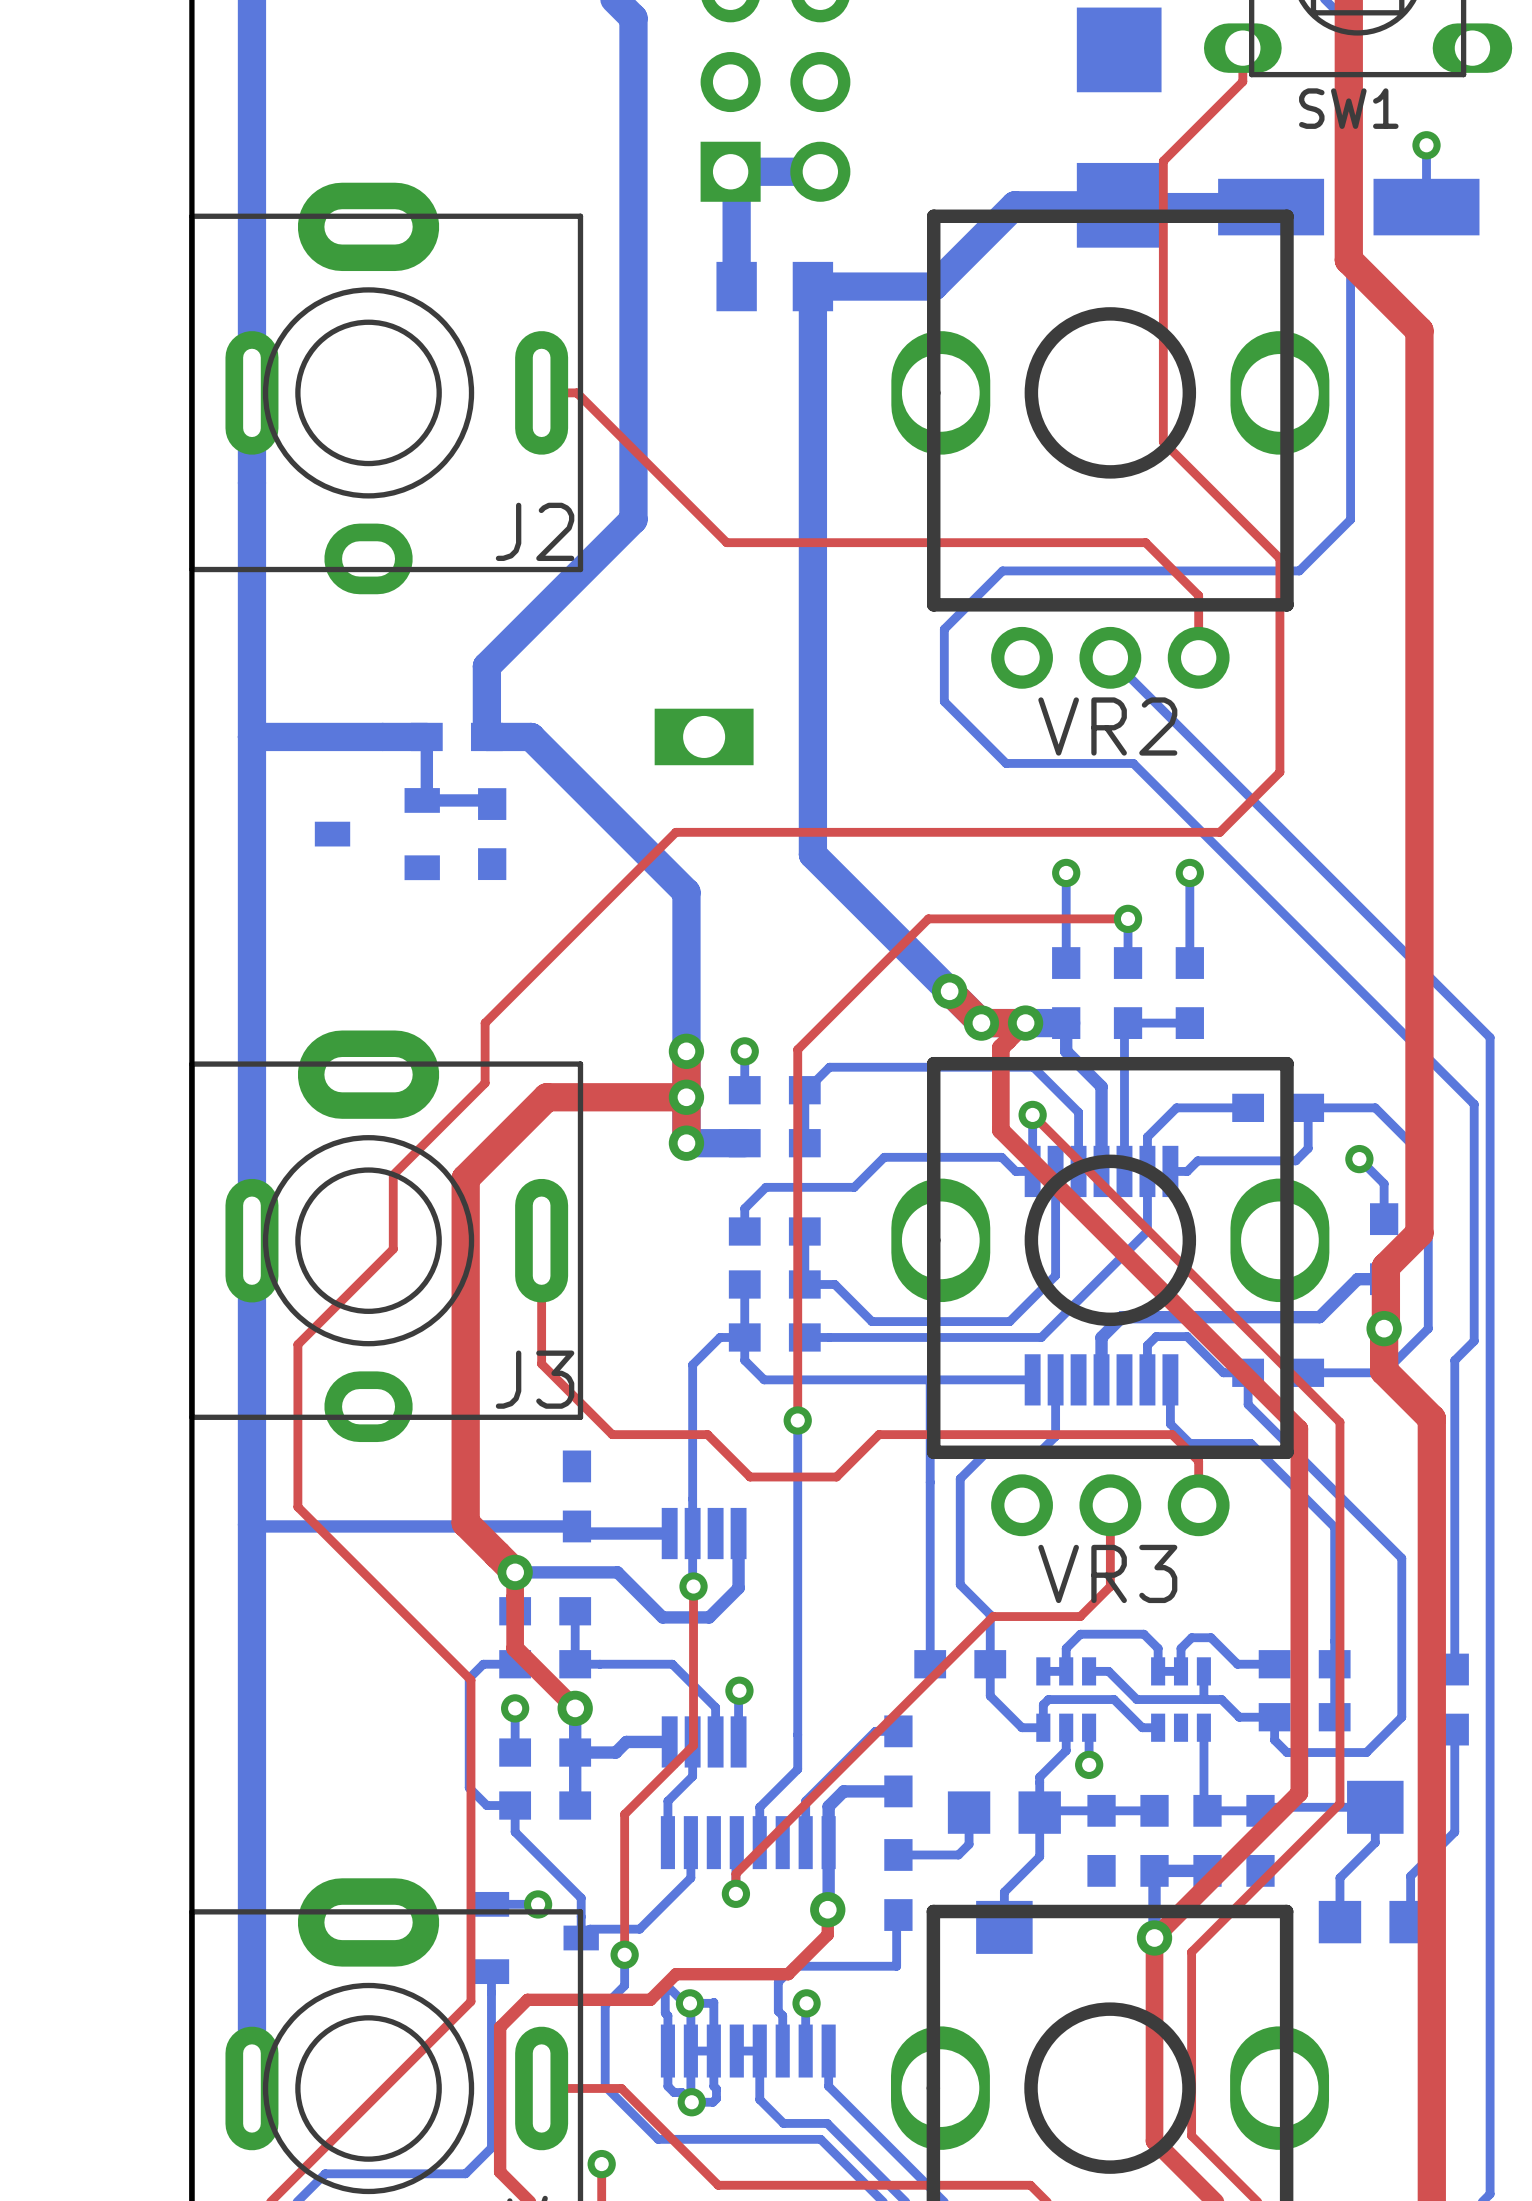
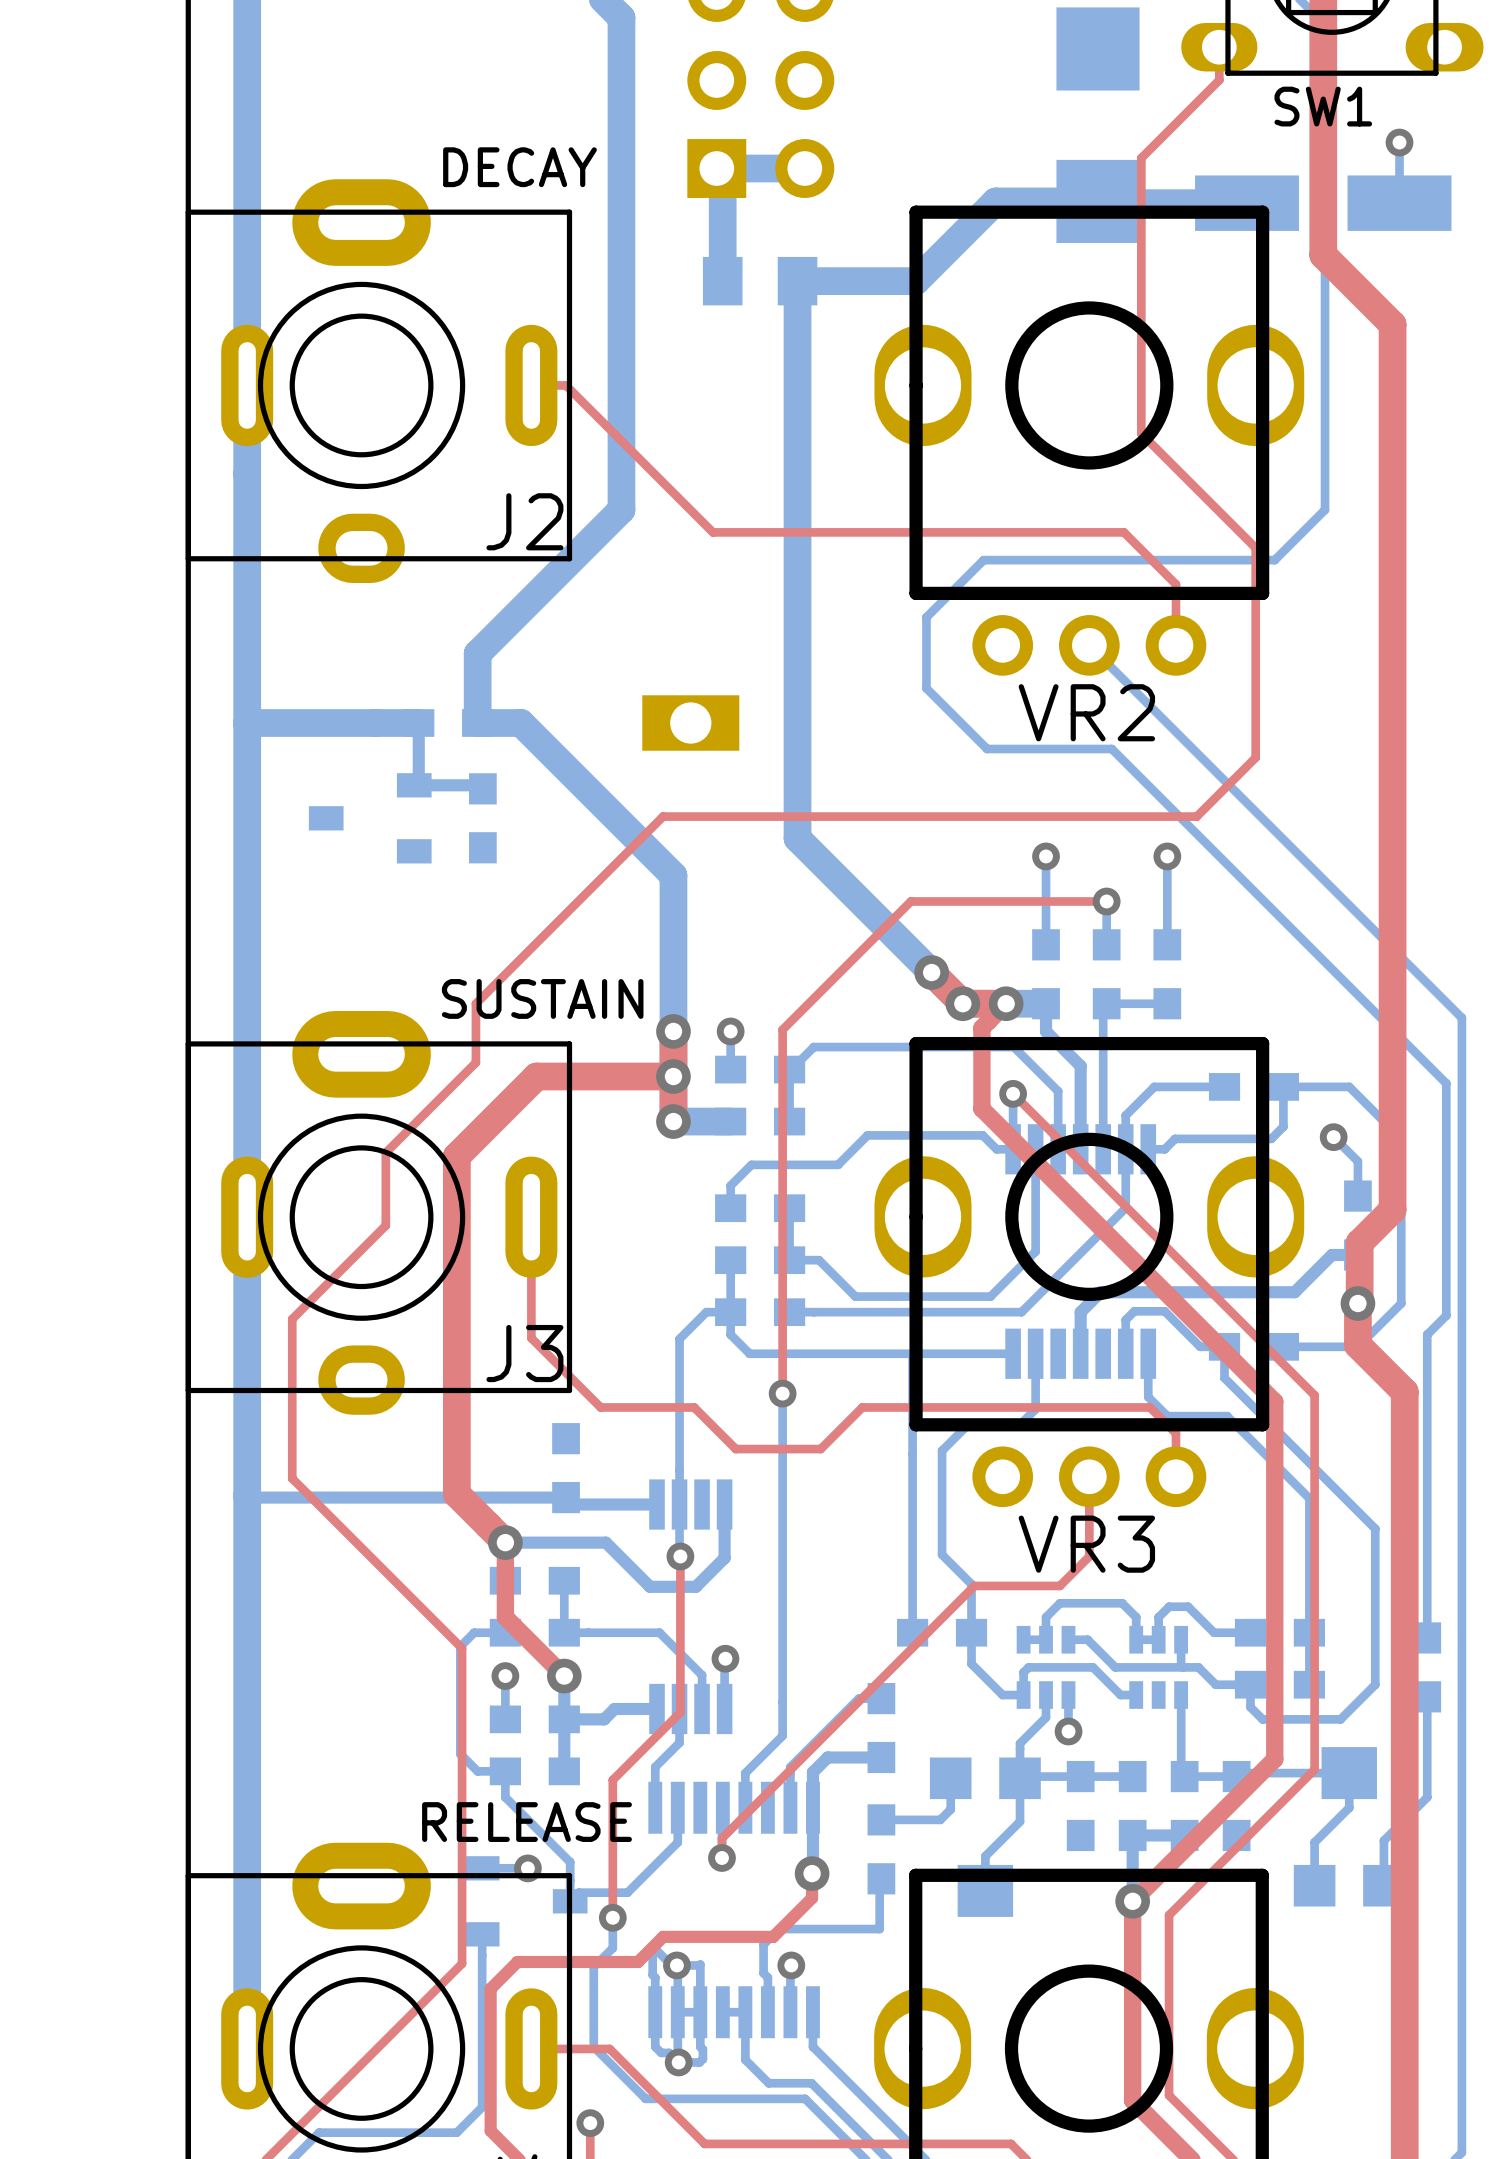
text: none -> DECAY (519, 167)
text: none -> SUSTAIN (542, 998)
text: none -> RELEASE (527, 1822)

